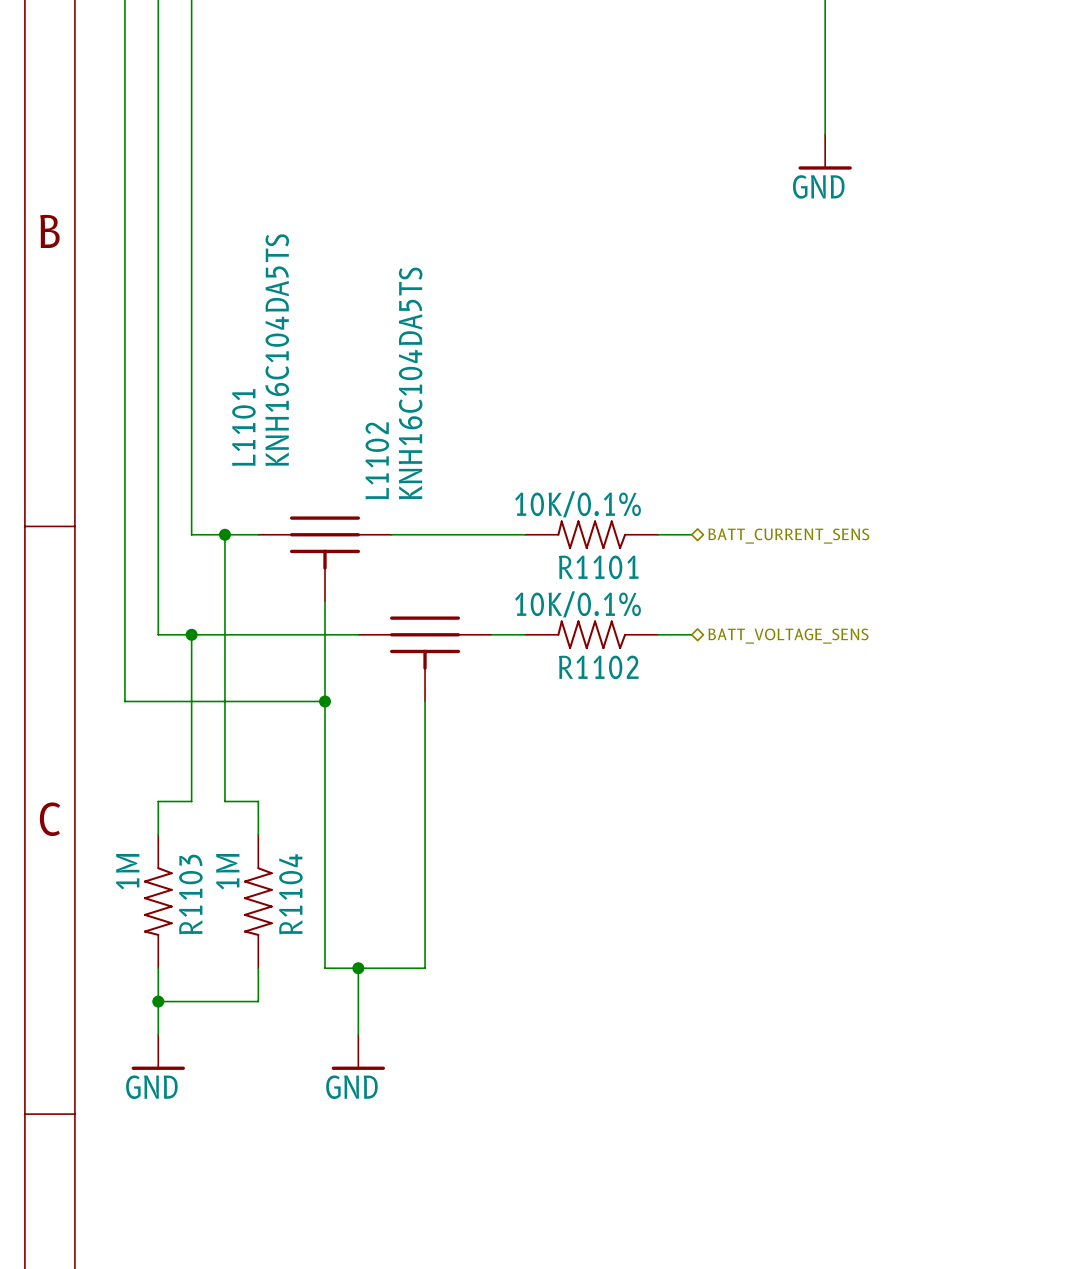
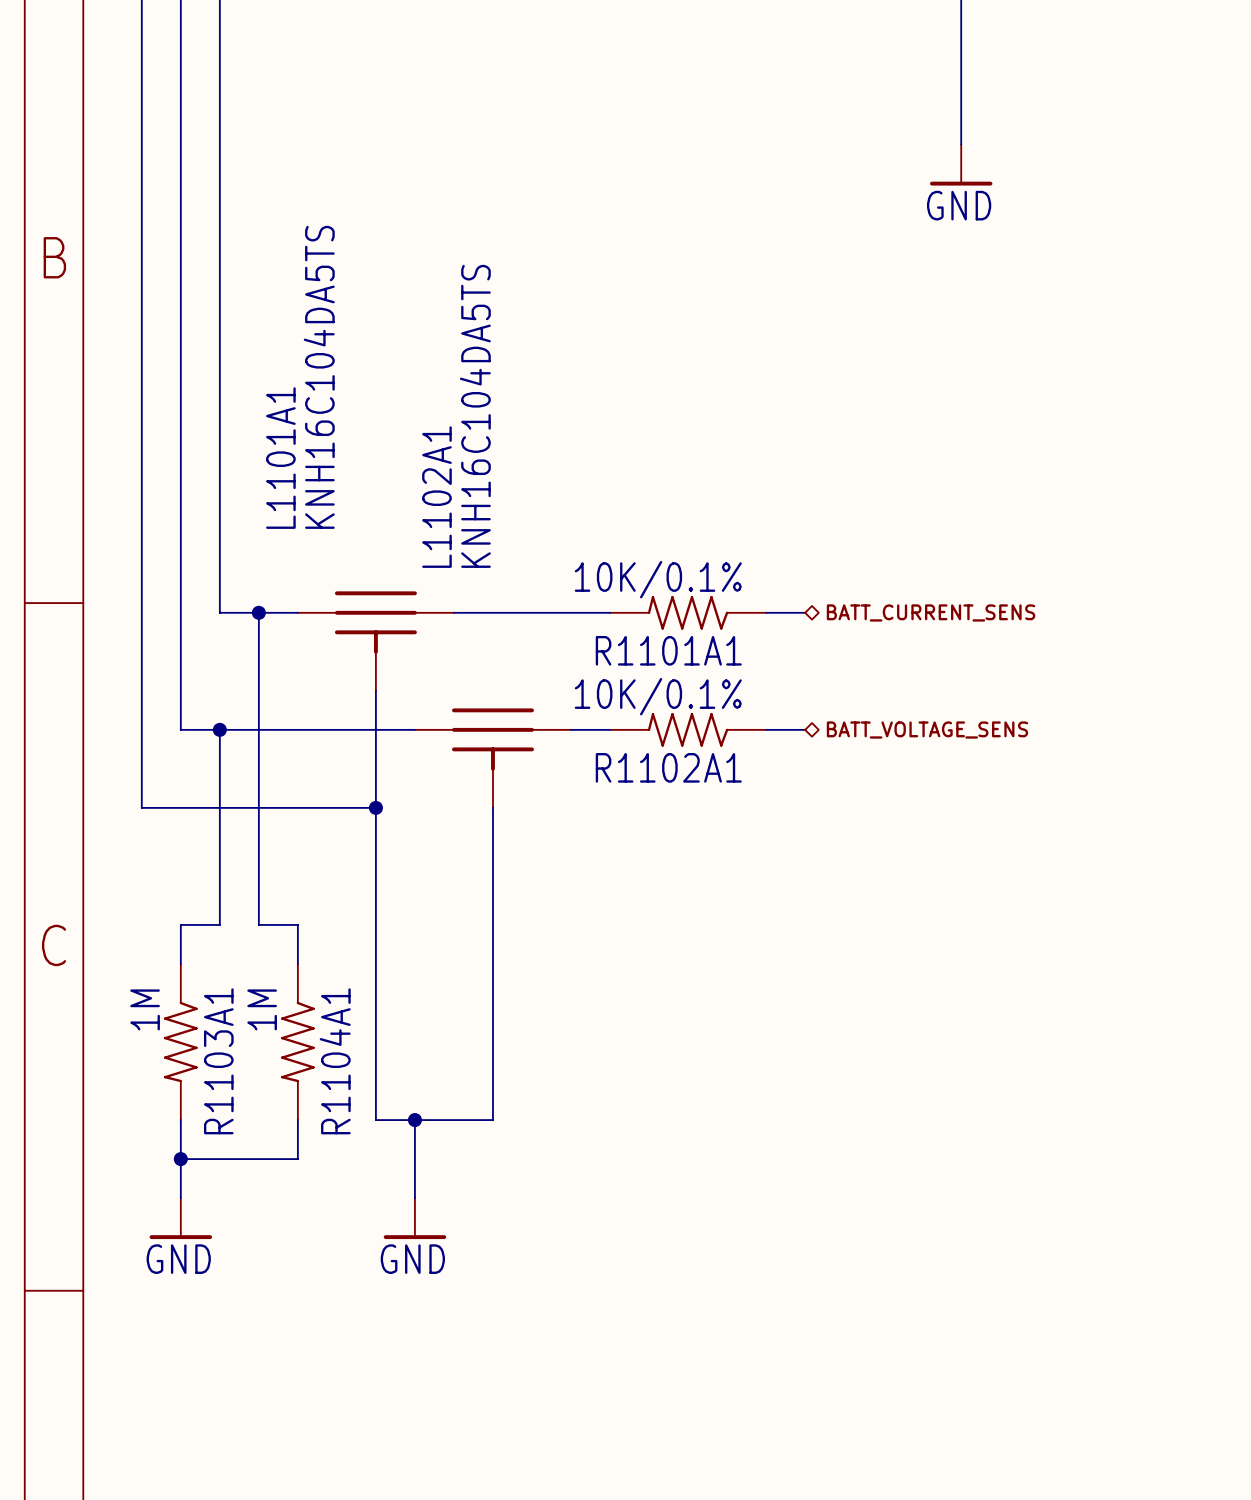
L1101 name: L1101 (243, 427) -> L1101A1 (280, 458)
L1102 name: L1102 (377, 460) -> L1102A1 (436, 497)
R1101 name: R1101 (598, 567) -> R1101A1 (668, 650)
R1102 name: R1102 (598, 667) -> R1102A1 (668, 767)
R1103 name: R1103 (190, 894) -> R1103A1 (218, 1061)
R1104 name: R1104 (290, 894) -> R1104A1 (335, 1061)

